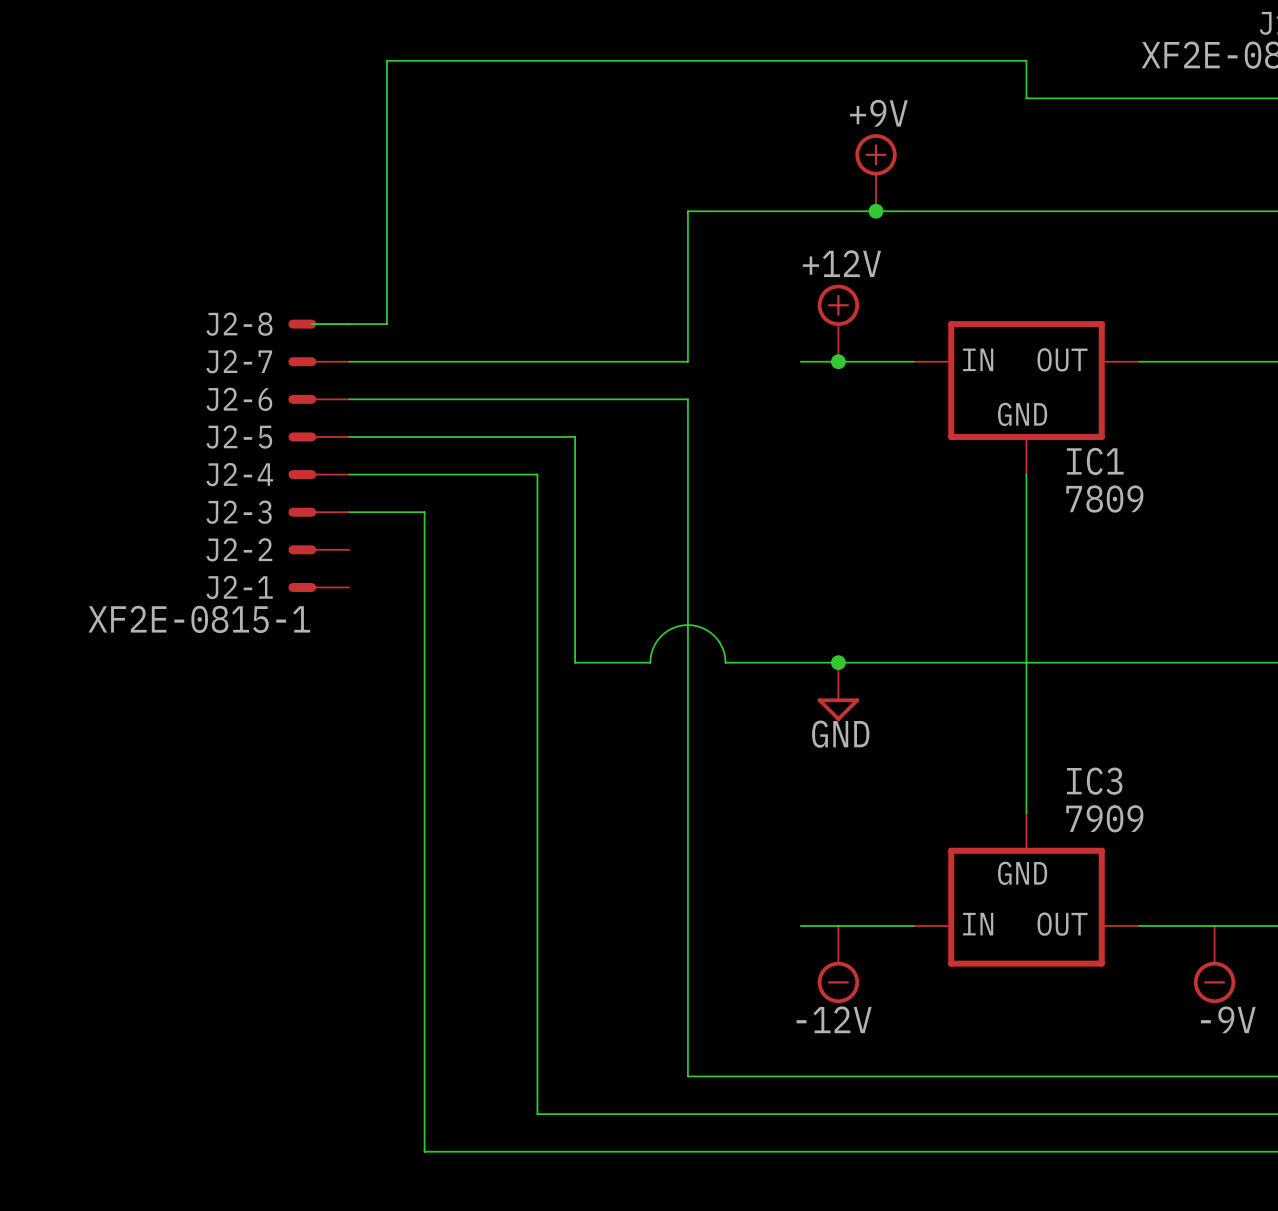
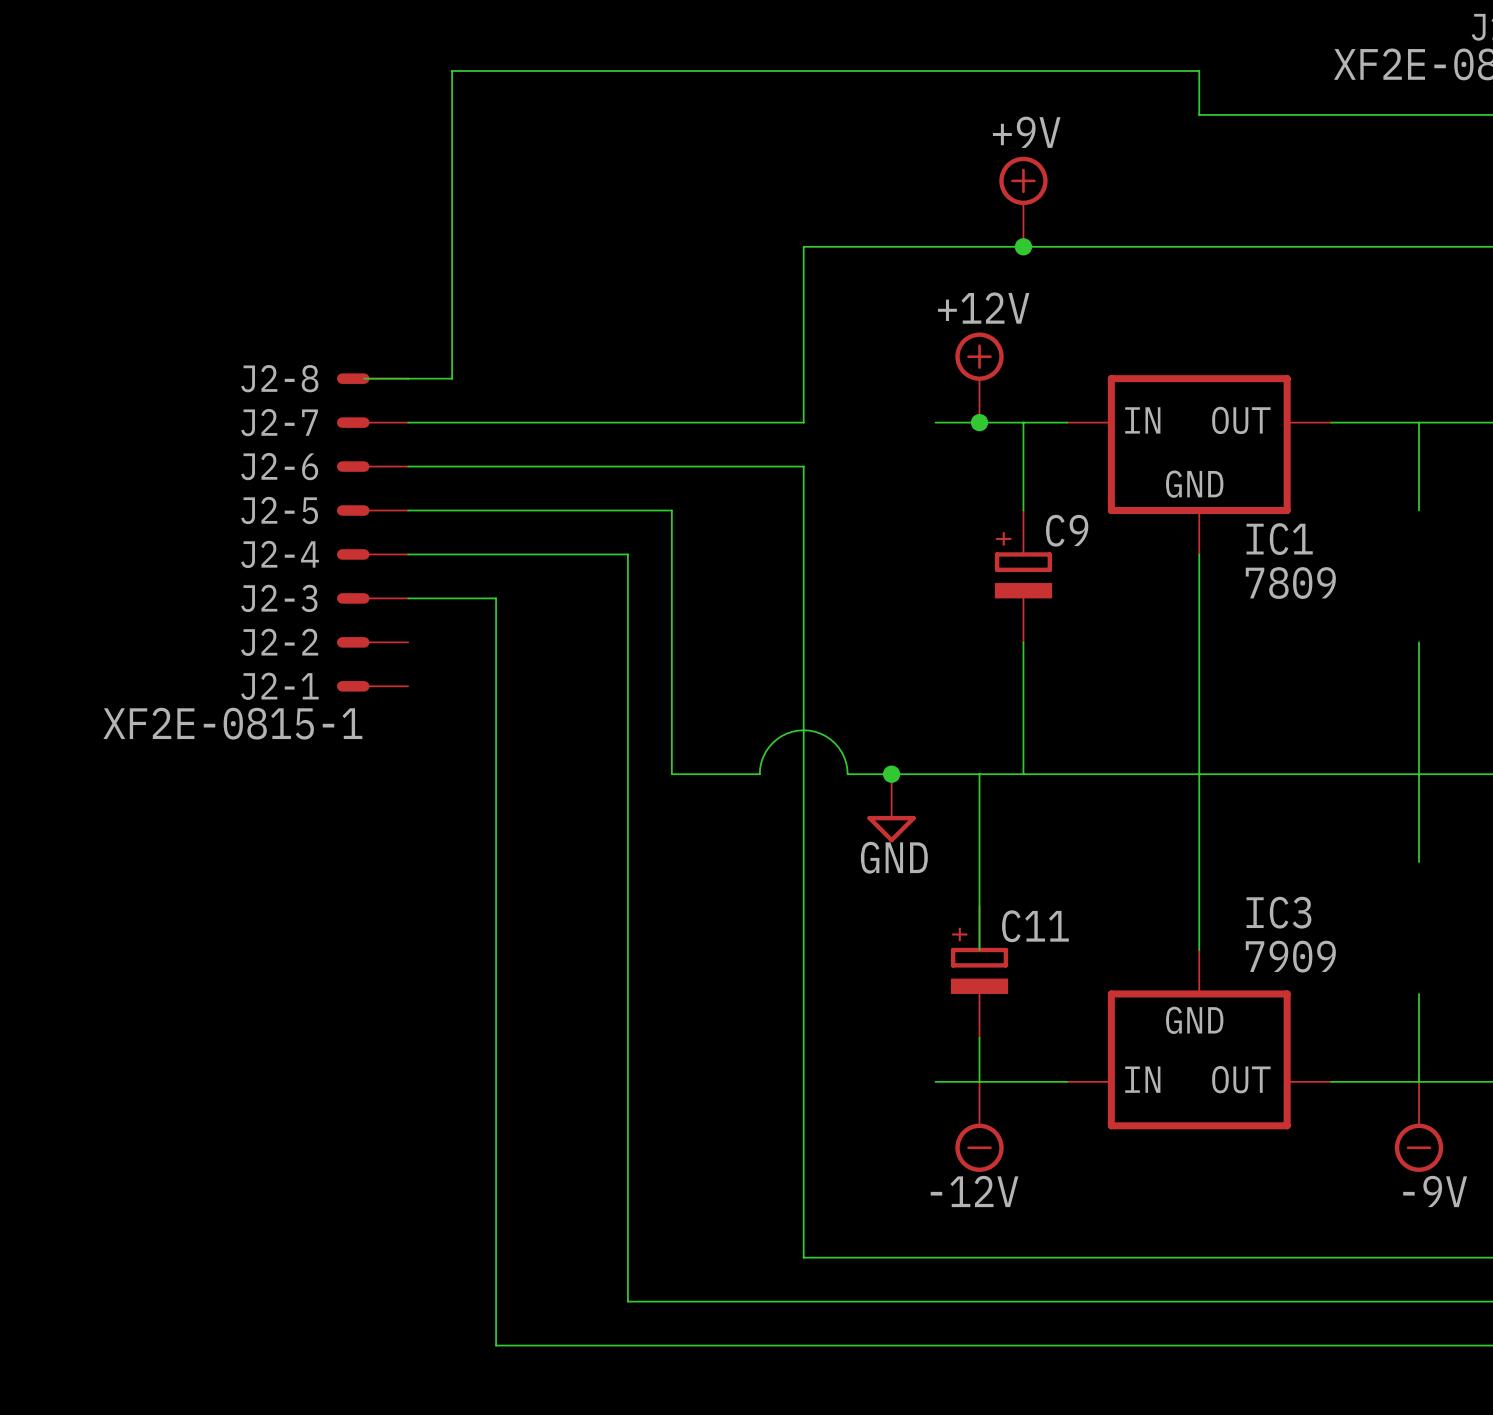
wire: none -> (1023, 422) (1023, 510)
wire: none -> (1419, 422) (1419, 510)
C9: none -> (1023, 576)
wire: none -> (1023, 642) (1023, 774)
wire: none -> (1419, 642) (1419, 862)
wire: none -> (979, 774) (979, 950)
junction position: (838, 662) -> (891, 774)
power symbol position: GND (838, 691) -> GND (891, 808)
C11: none -> (979, 971)
wire: none -> (1419, 993) (1419, 1081)
wire: none -> (979, 1037) (979, 1081)

